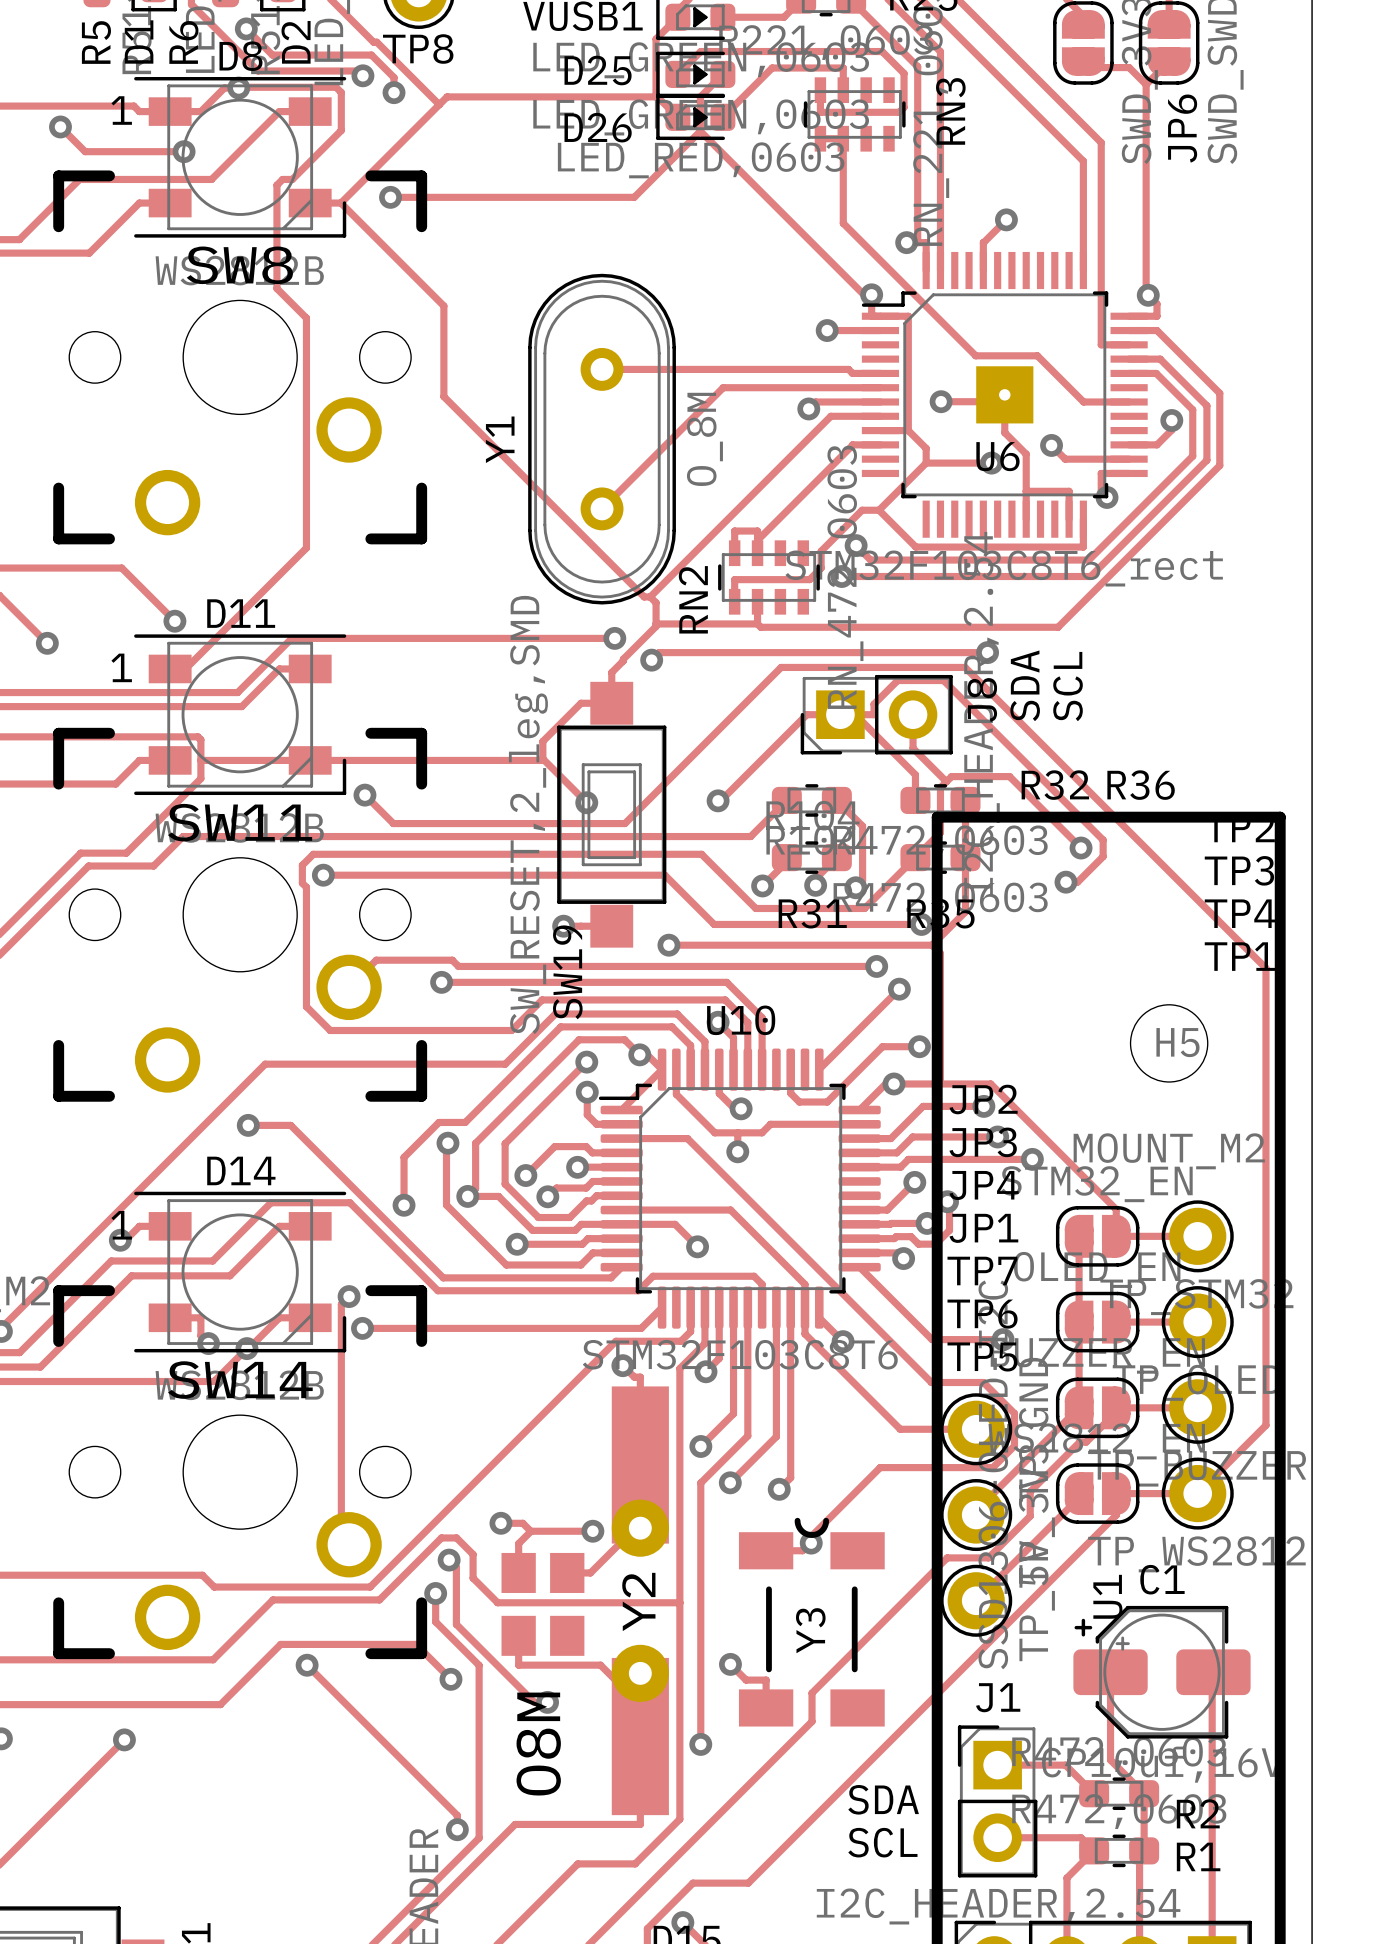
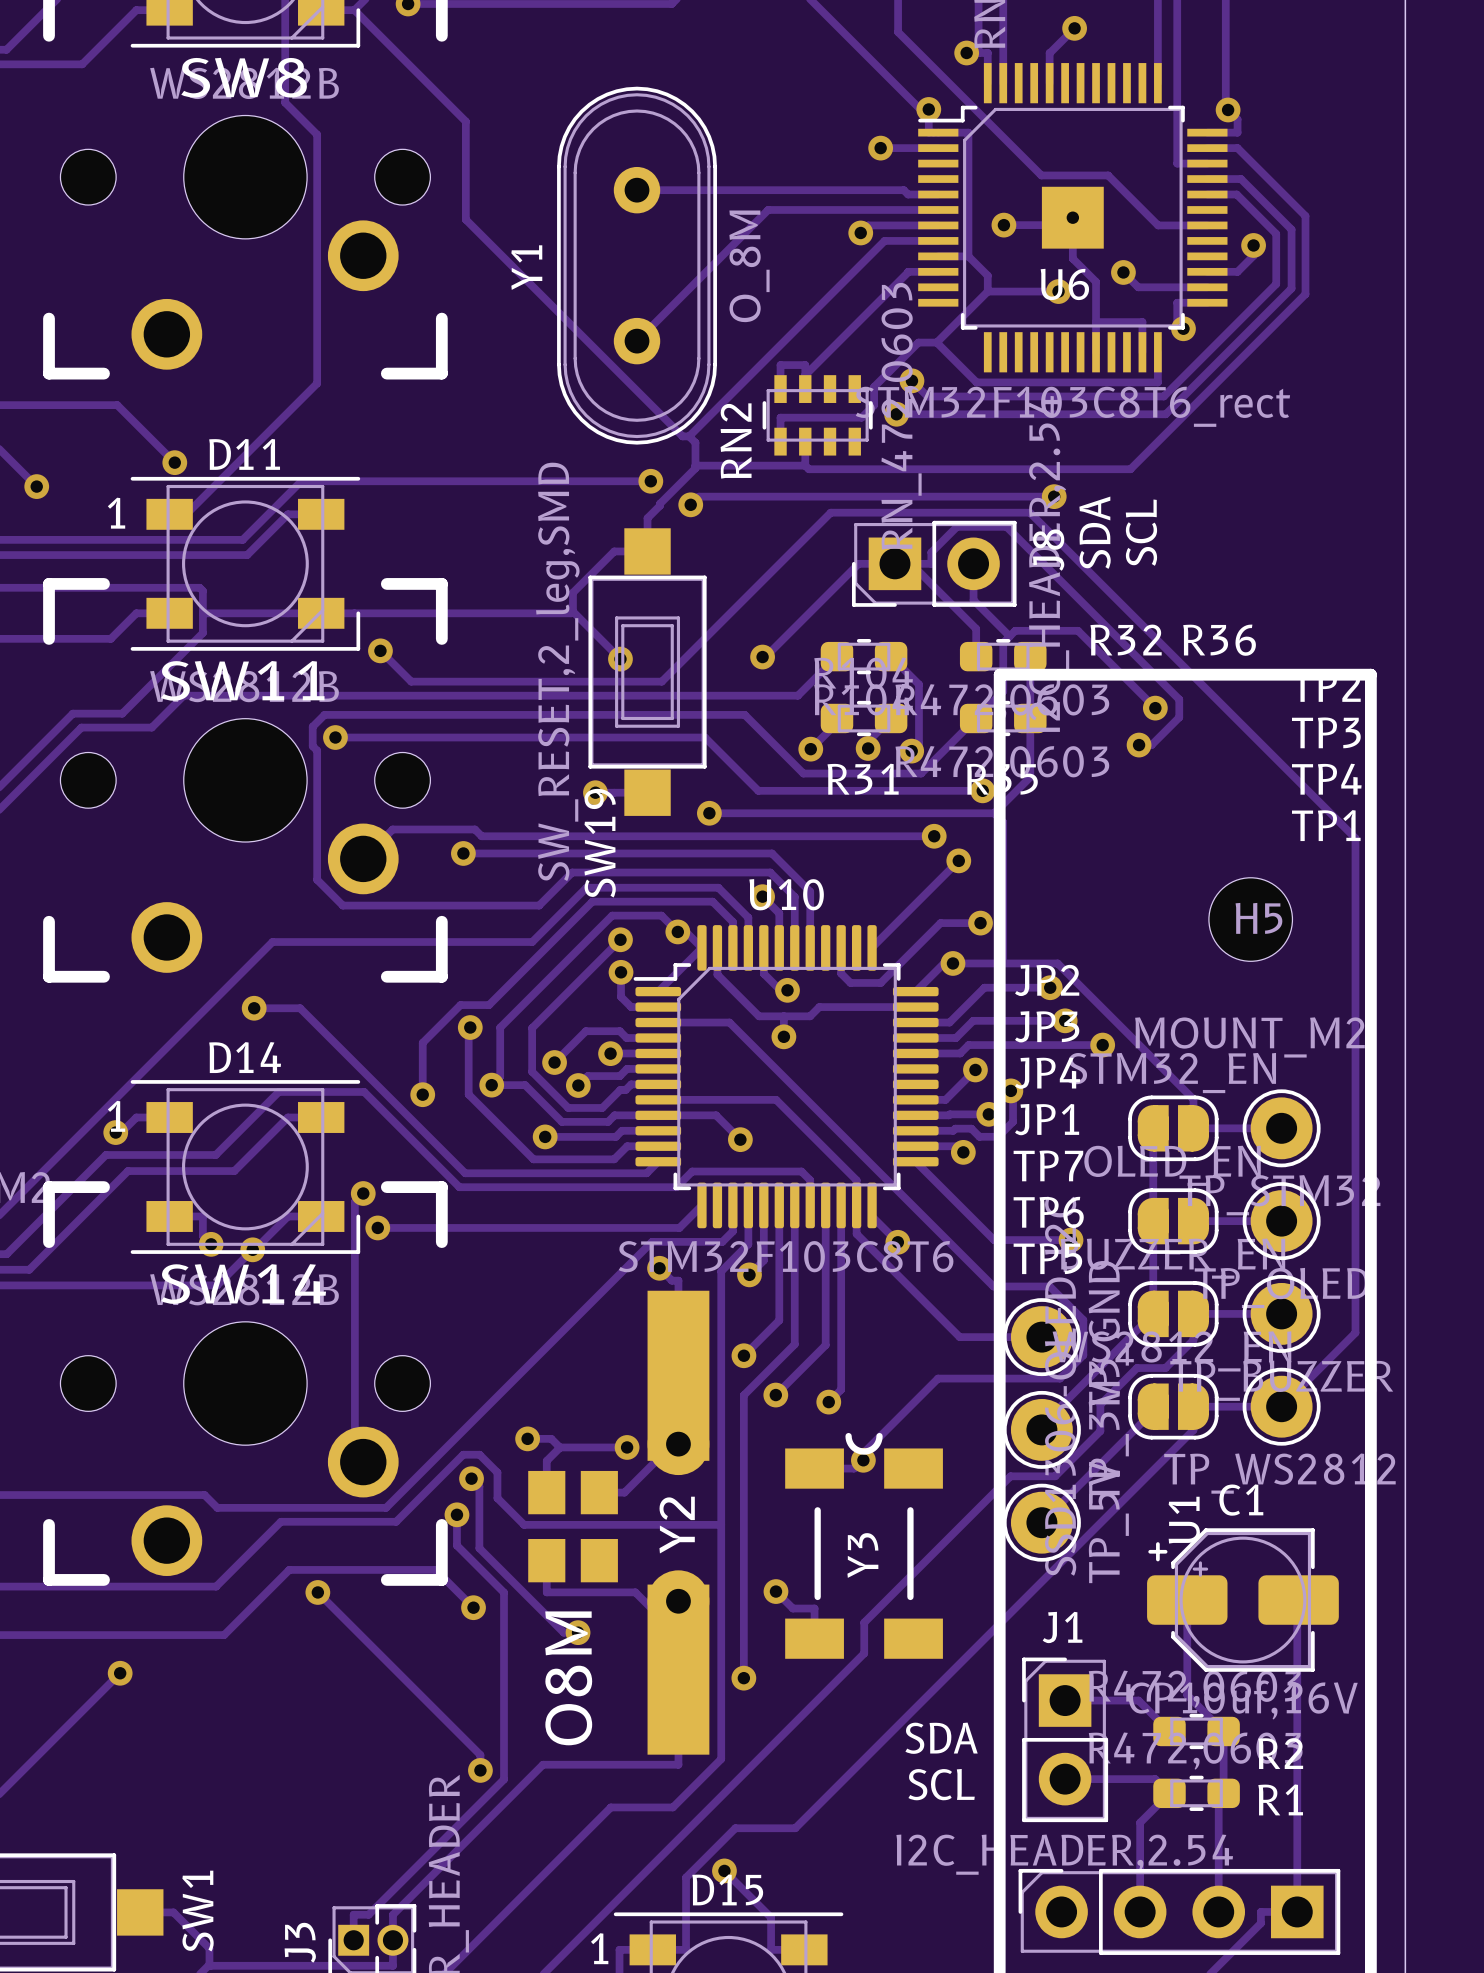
track: (1116, 1412) (1086, 1442) (1079, 1442) (1064, 1457) -> (1193, 1318) (1193, 1340) (1165, 1368) (1136, 1368)

